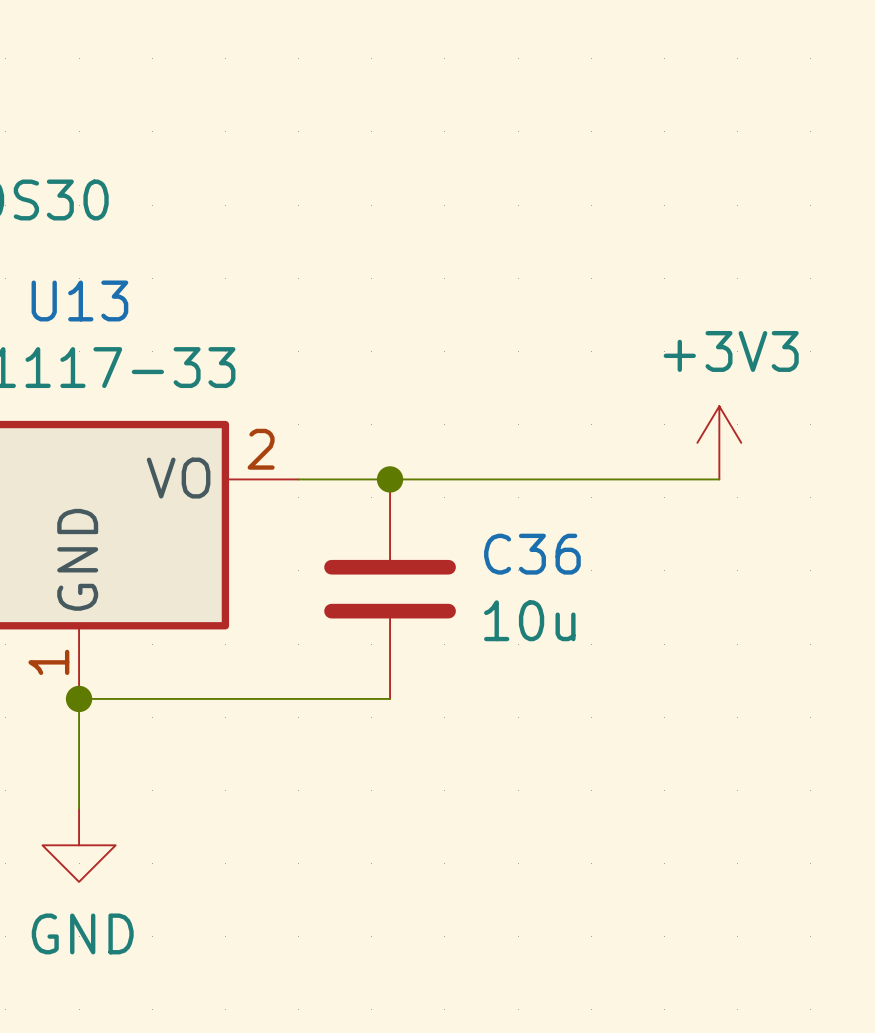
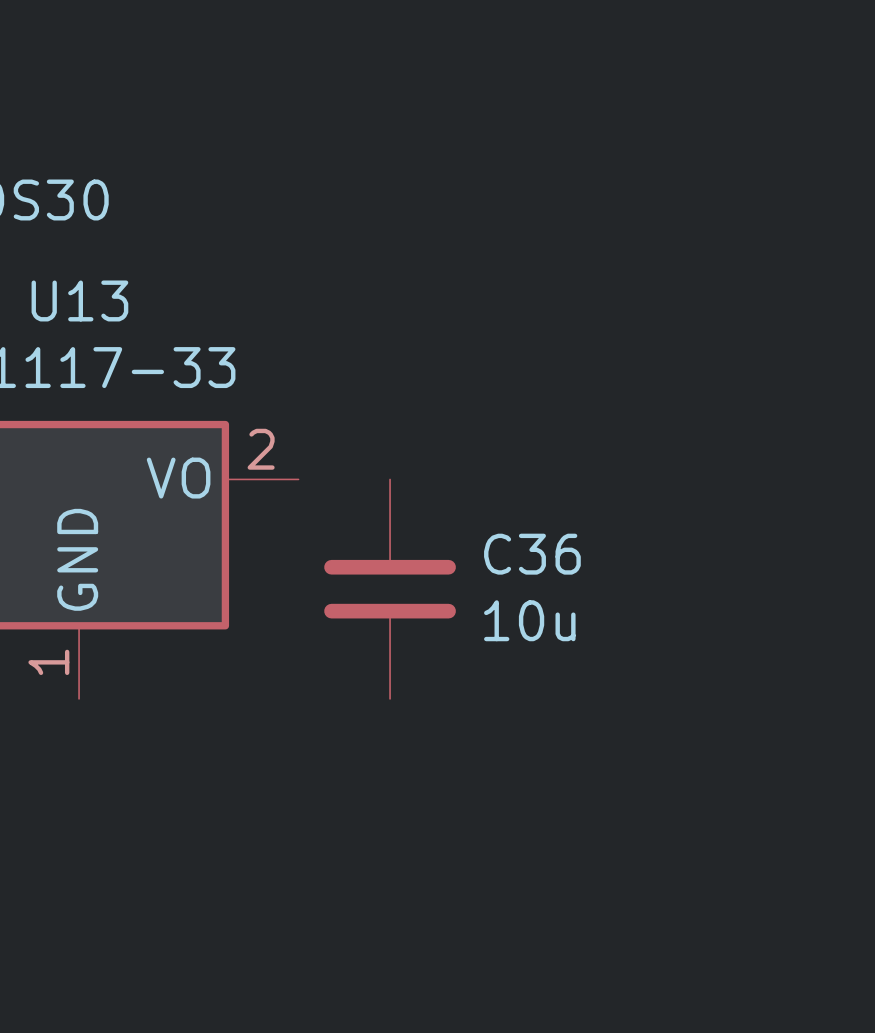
power symbol: +3V3 (719, 442) -> none
wire: (298, 479) (719, 479) -> none
junction: (390, 479) -> none
junction: (79, 698) -> none
wire: (390, 698) (79, 698) (79, 808) -> none
power symbol: GND (79, 845) -> none

